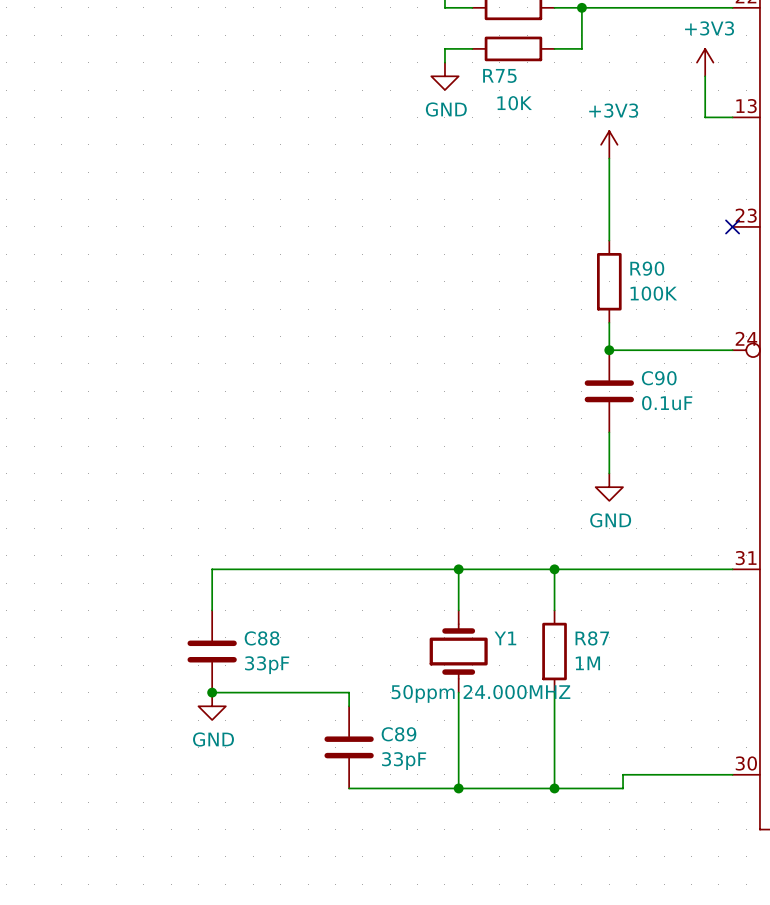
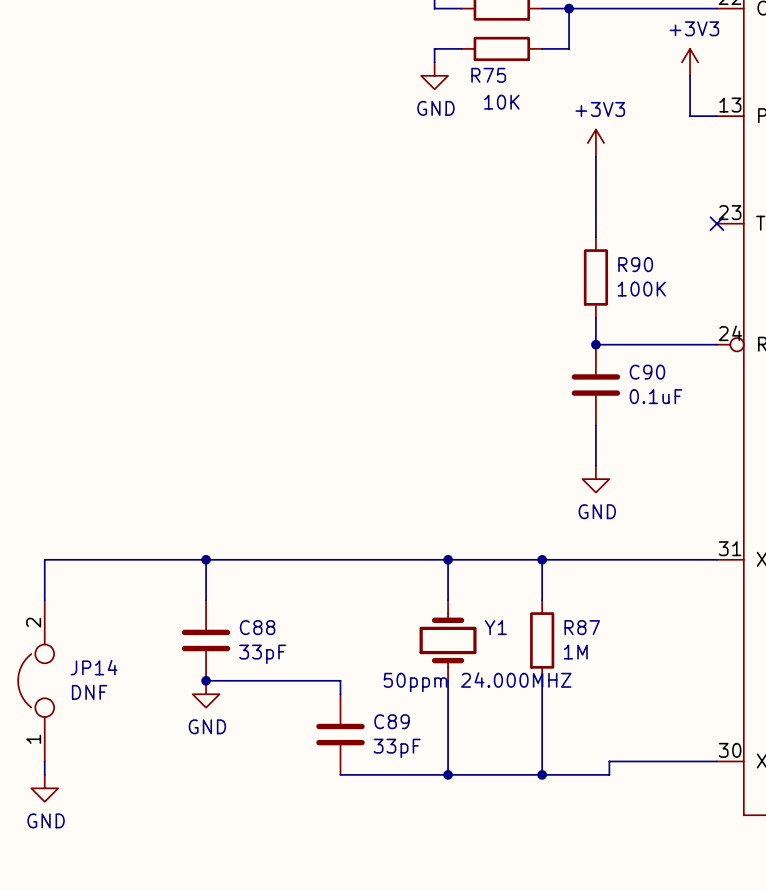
wire: none -> (206, 559) (44, 559) (44, 600)
junction: none -> (206, 559)
JP14: none -> DNF (36, 680)
wire: none -> (44, 761) (44, 774)
power symbol: none -> GND (44, 788)

